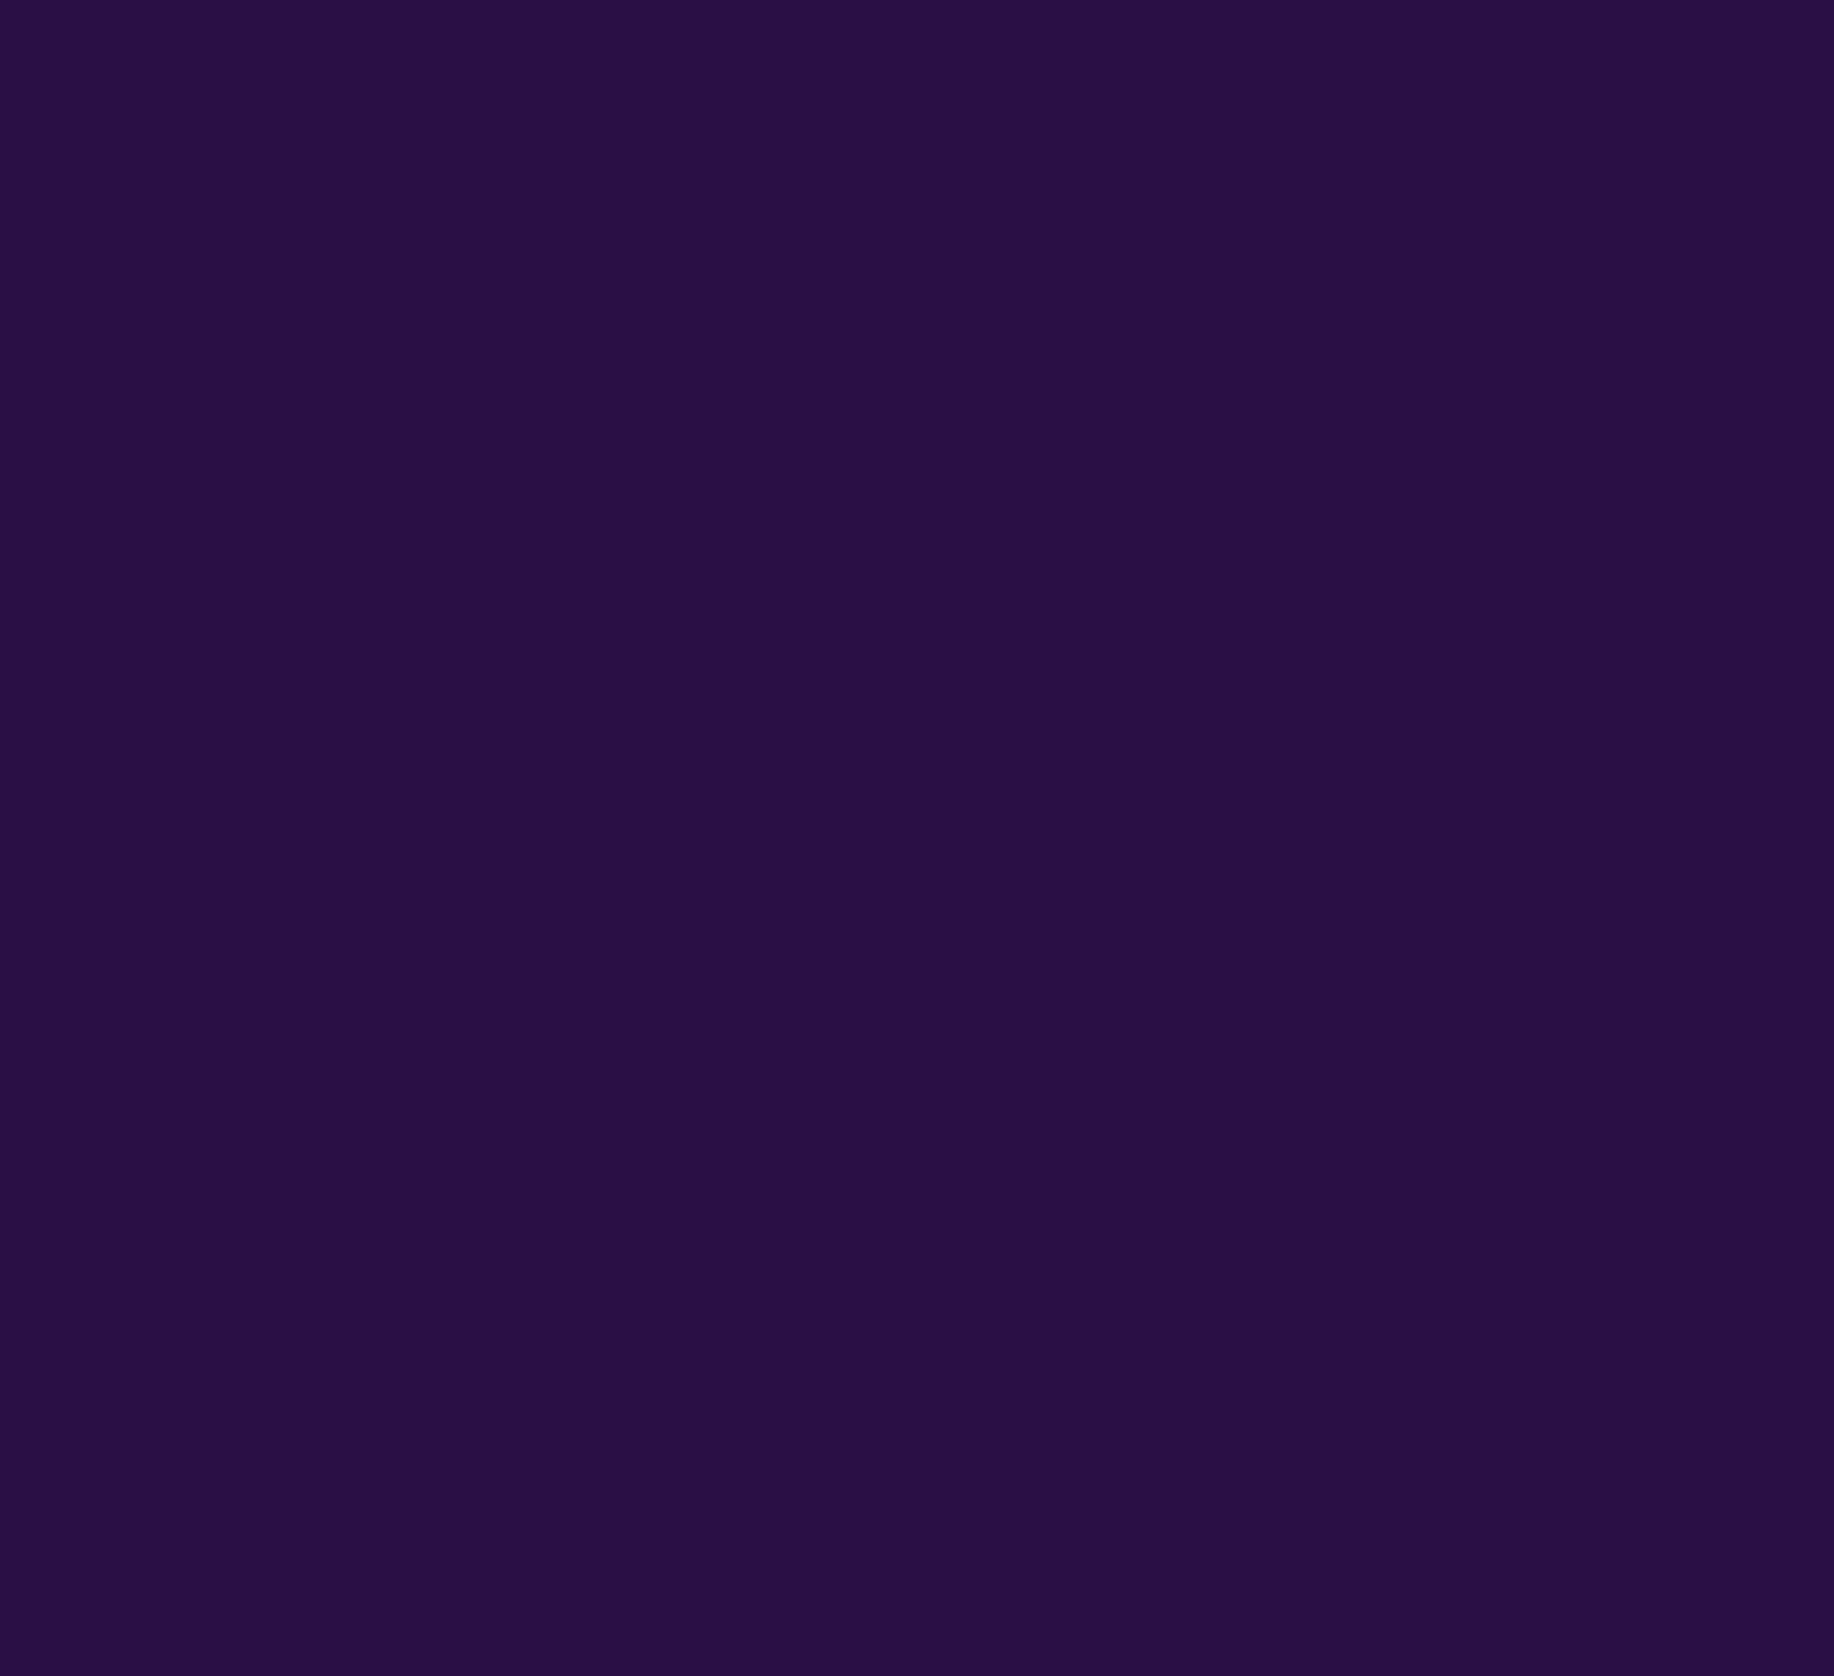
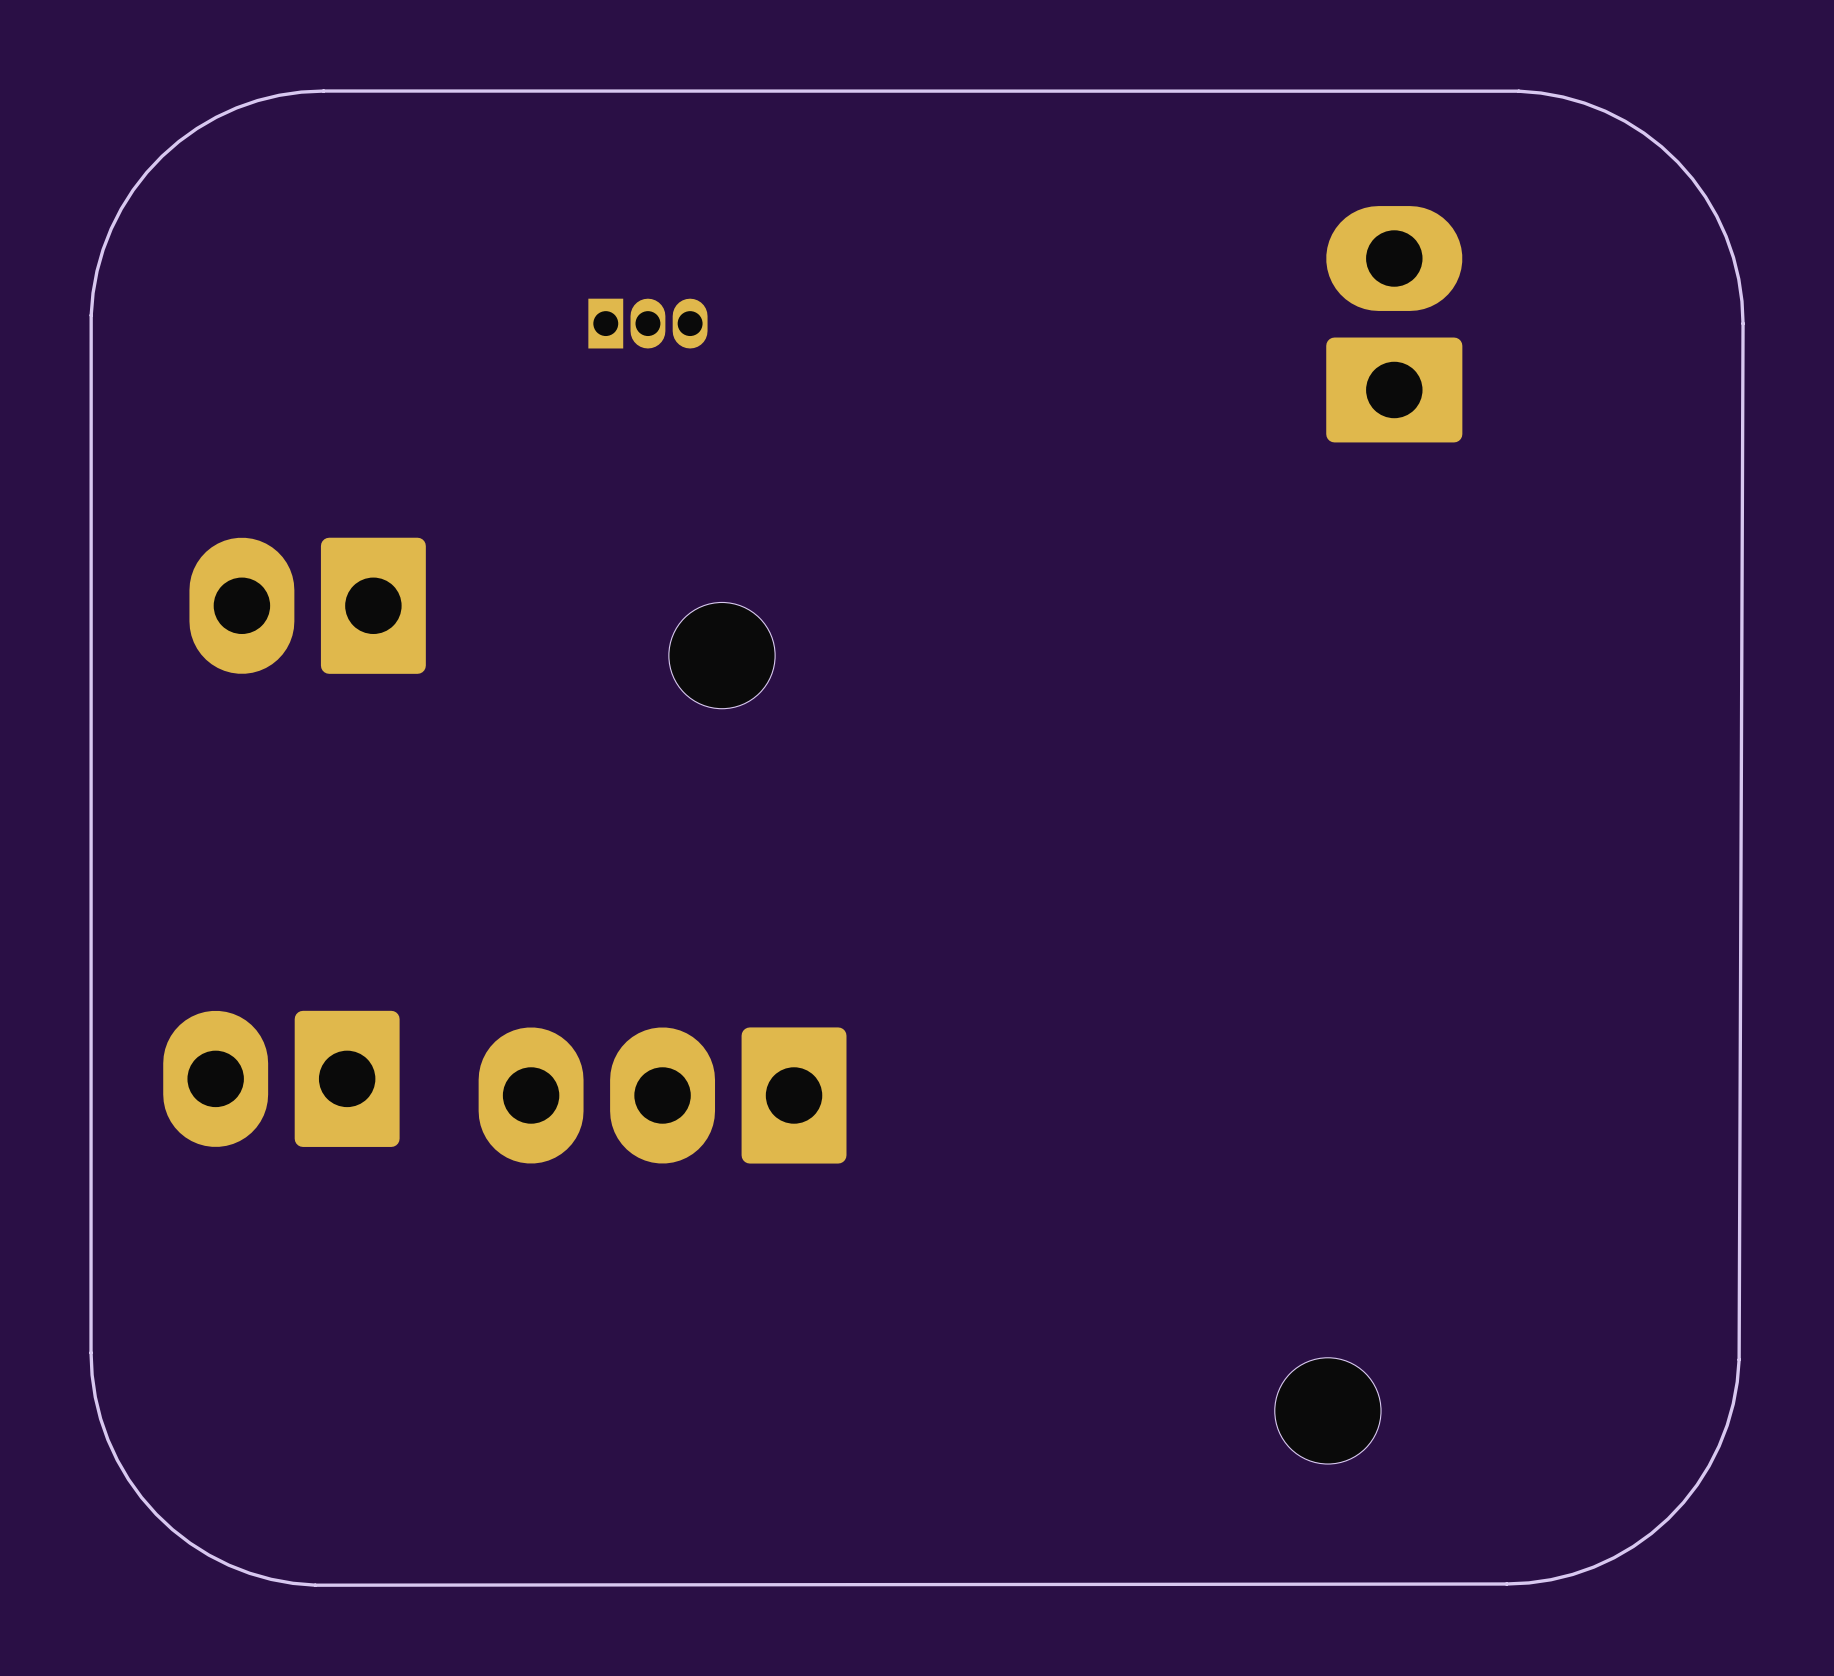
board edge: none -> (1518, 91) (323, 91) (279, 95) (236, 107) (196, 128) (162, 156) (133, 190) (111, 228) (97, 271) (91, 315) (92, 1375) (100, 1418) (117, 1460) (141, 1497) (156, 1514) (190, 1543) (228, 1565) (271, 1579) (315, 1585) (1529, 1582) (1572, 1574) (1614, 1557) (1633, 1546) (1668, 1518) (1697, 1484) (1719, 1446) (1733, 1403) (1739, 1359) (1741, 301) (1733, 257) (1716, 216) (1692, 178) (1661, 146) (1625, 121) (1584, 103) (1541, 93) (1518, 91)
part: none -> (647, 323)
part: none -> (1394, 324)
part: none -> (307, 605)
part: none -> (721, 655)
part: none -> (281, 1078)
part: none -> (662, 1095)
part: none -> (1327, 1410)

